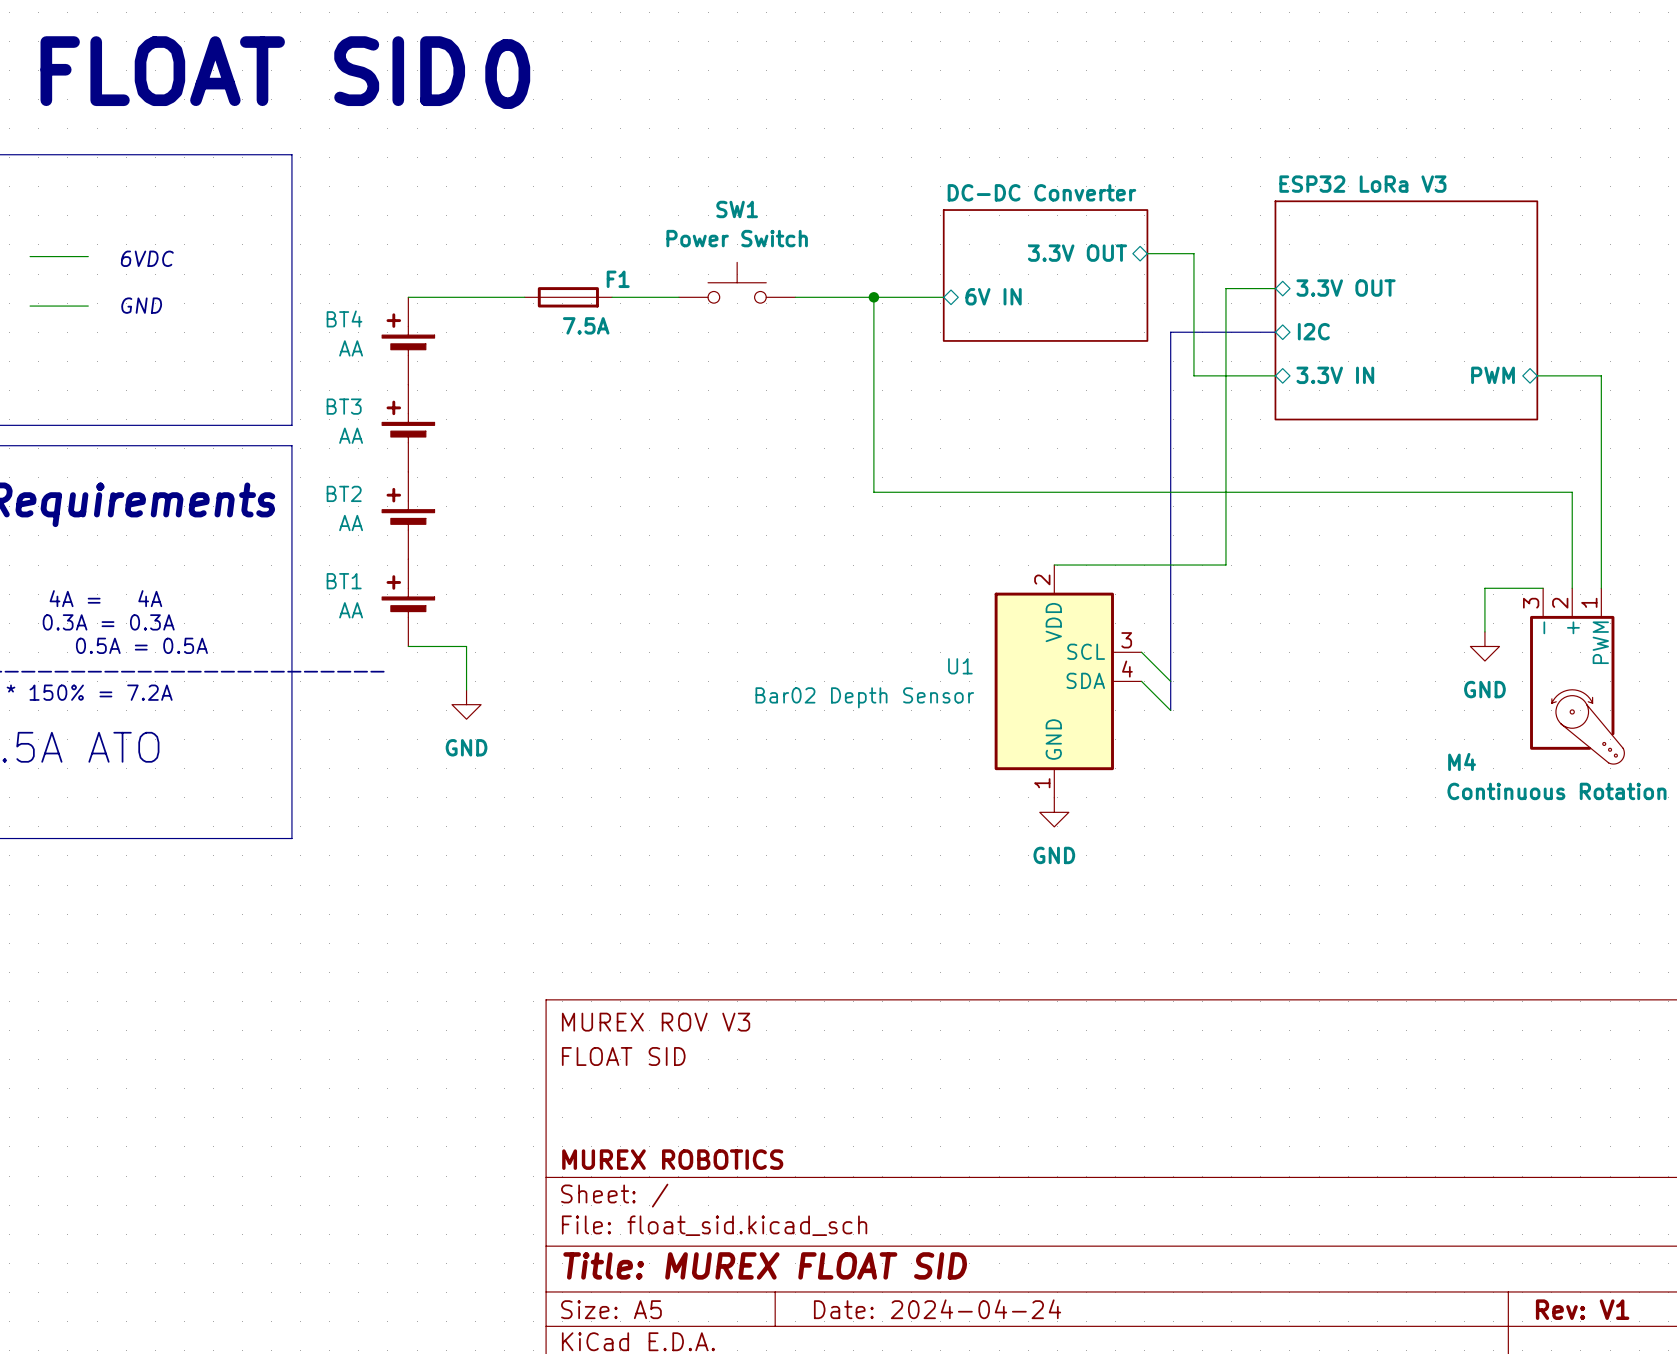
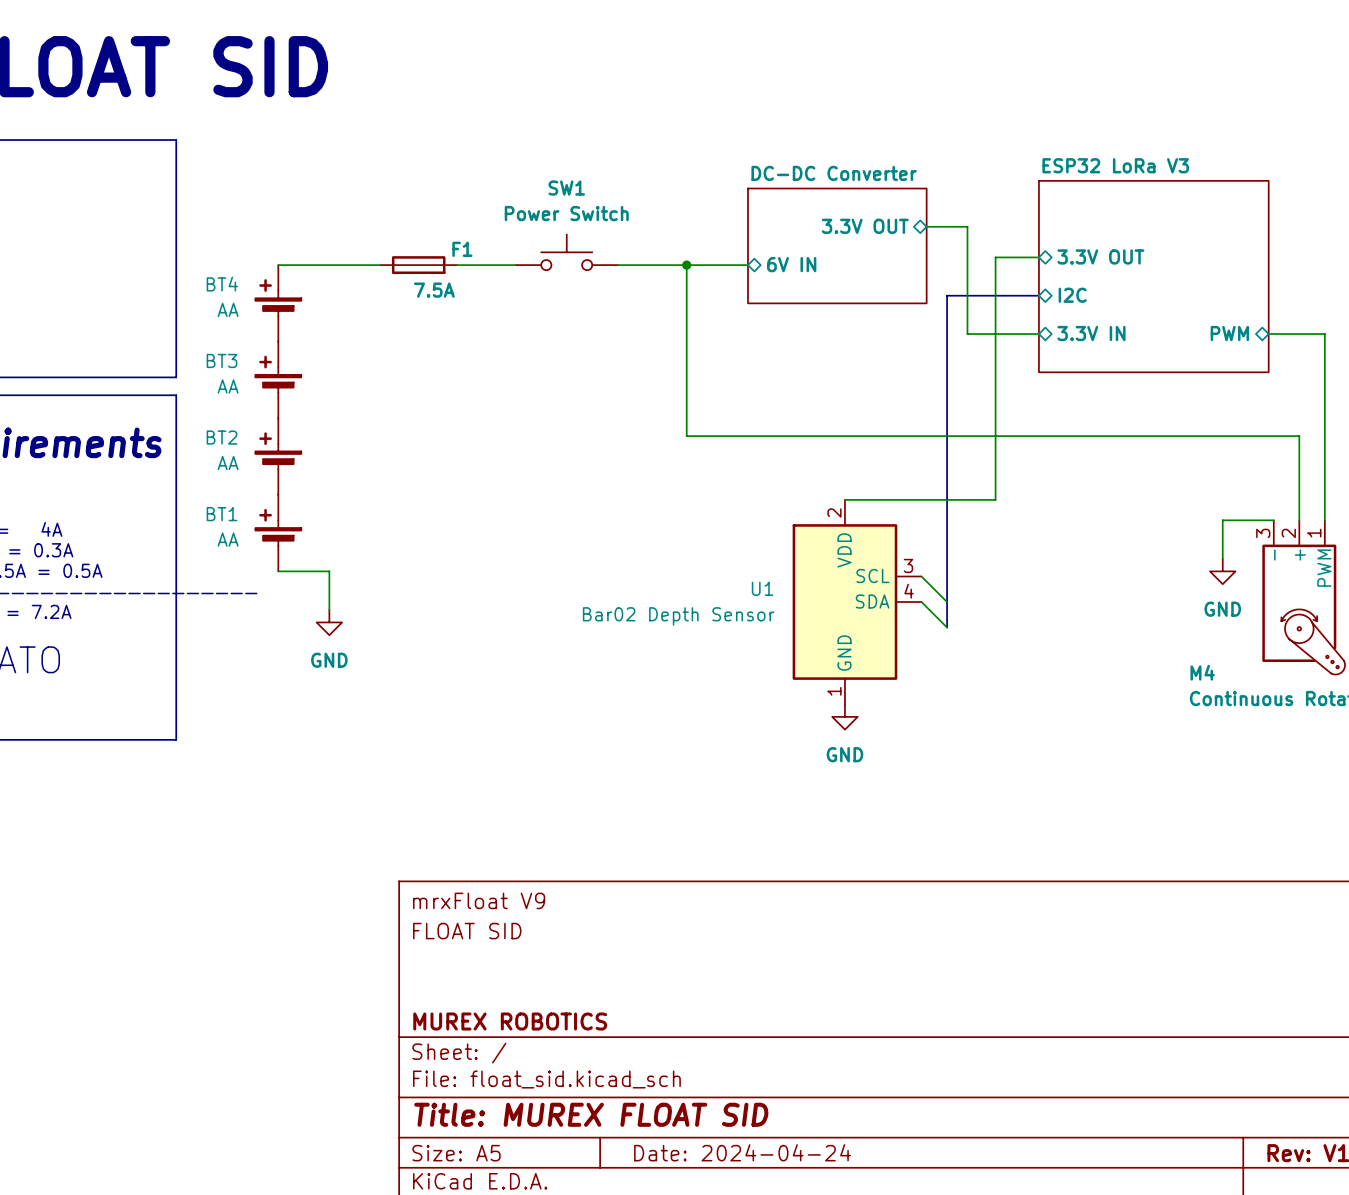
text: 0 (507, 74) -> none
text: 6VDC (147, 258) -> none
text: GND (141, 305) -> none
title block: MUREX ROV V3 (656, 1022) -> mrxFloat V9 (479, 900)

